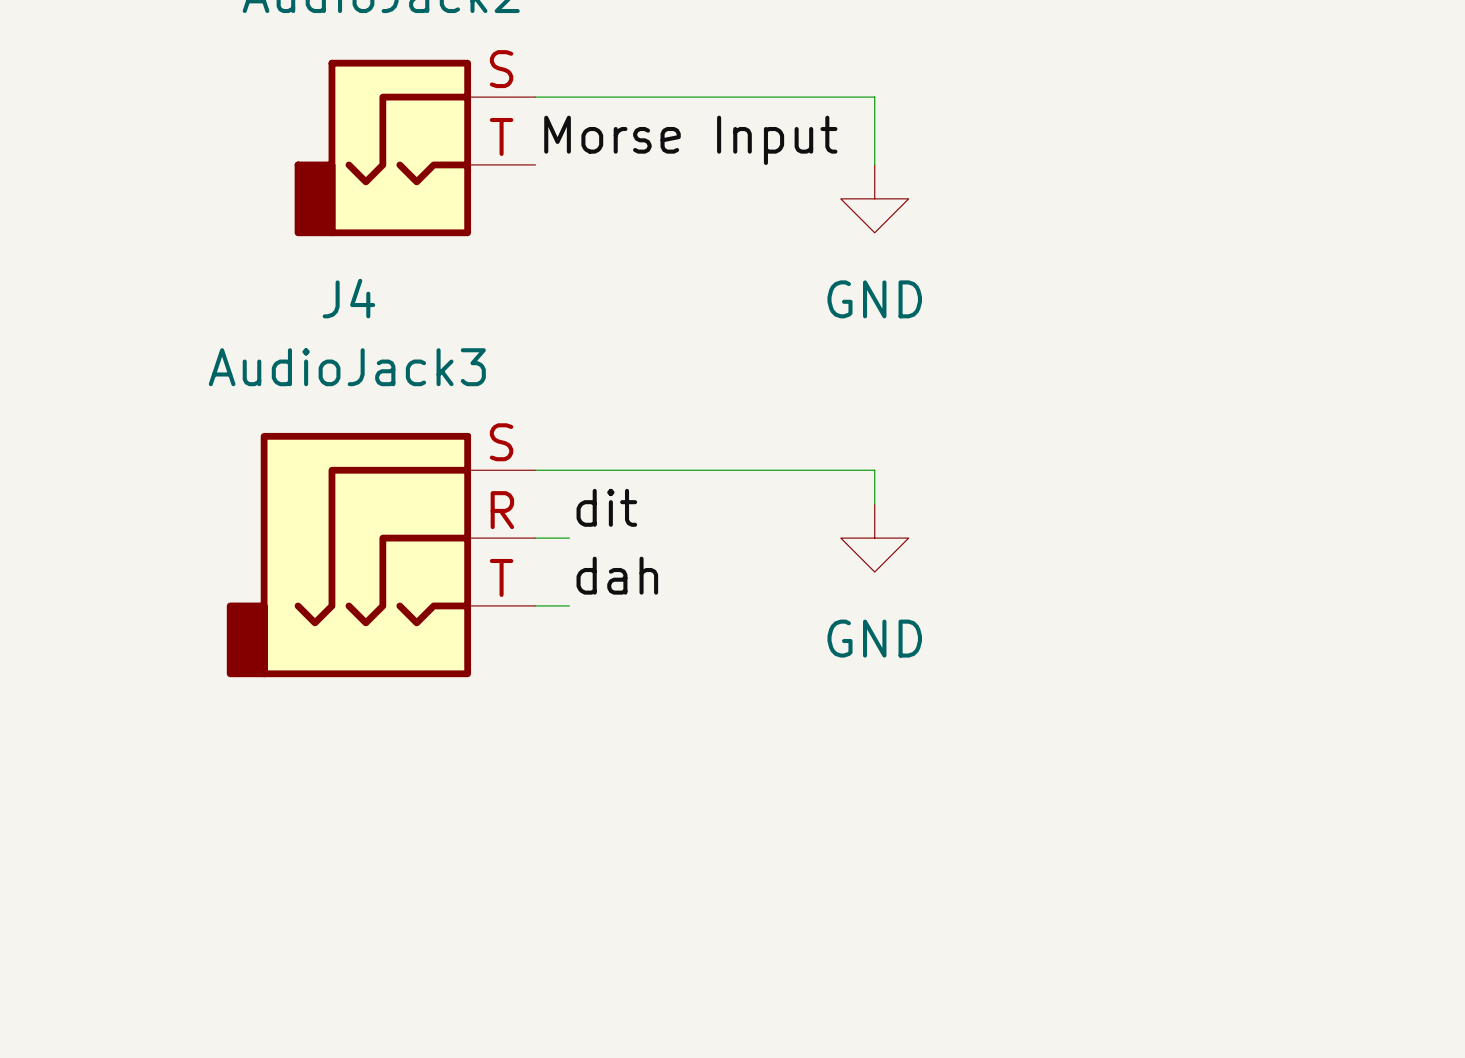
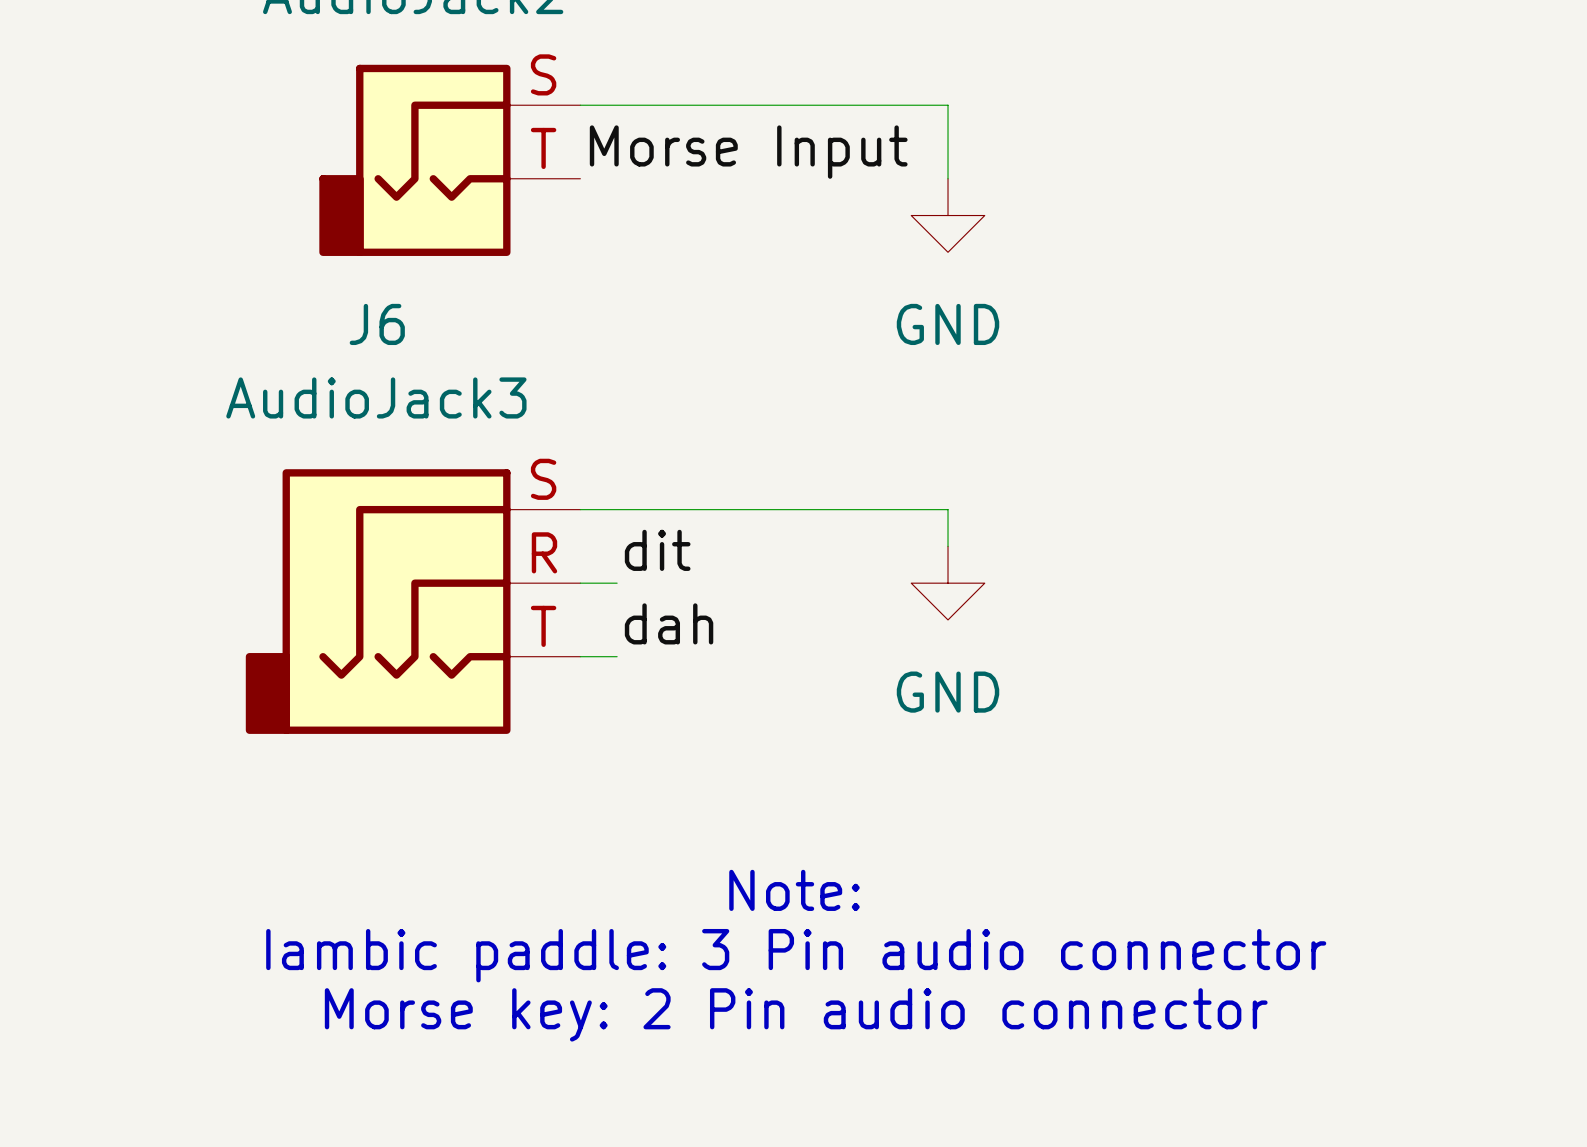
J4 name: J4 (348, 298) -> J6 (377, 324)
text: none -> Note: (794, 890)
text: none -> Iambic paddle: 3 Pin audio connector (796, 955)
text: none -> Morse key: 2 Pin audio connector (796, 1014)

